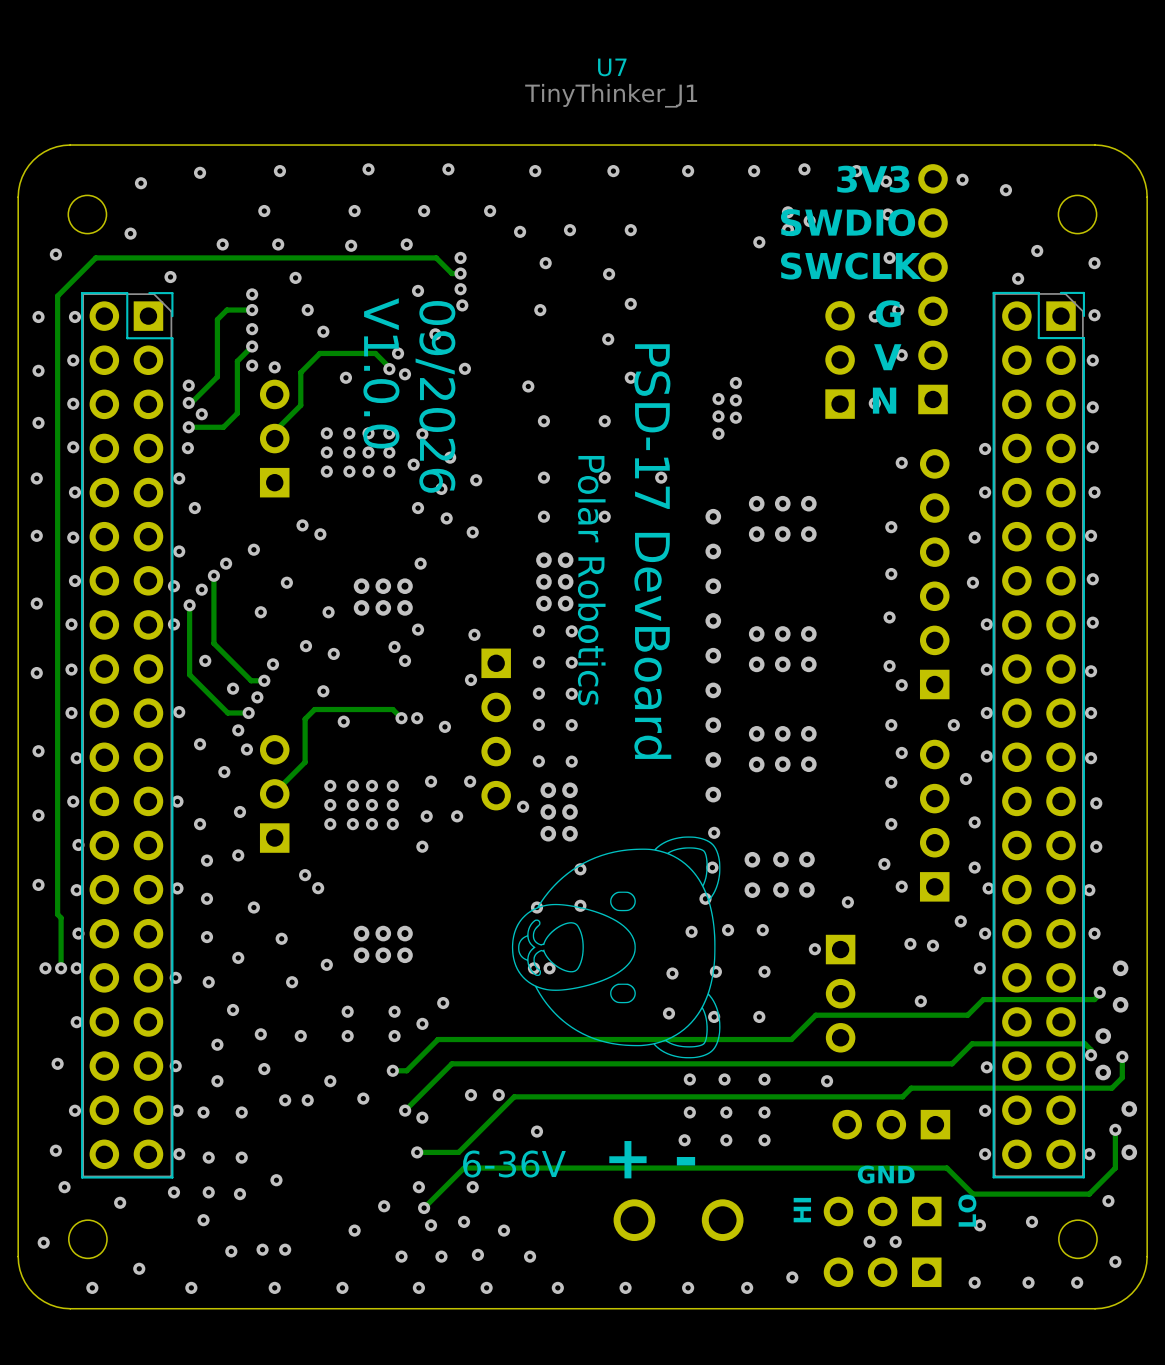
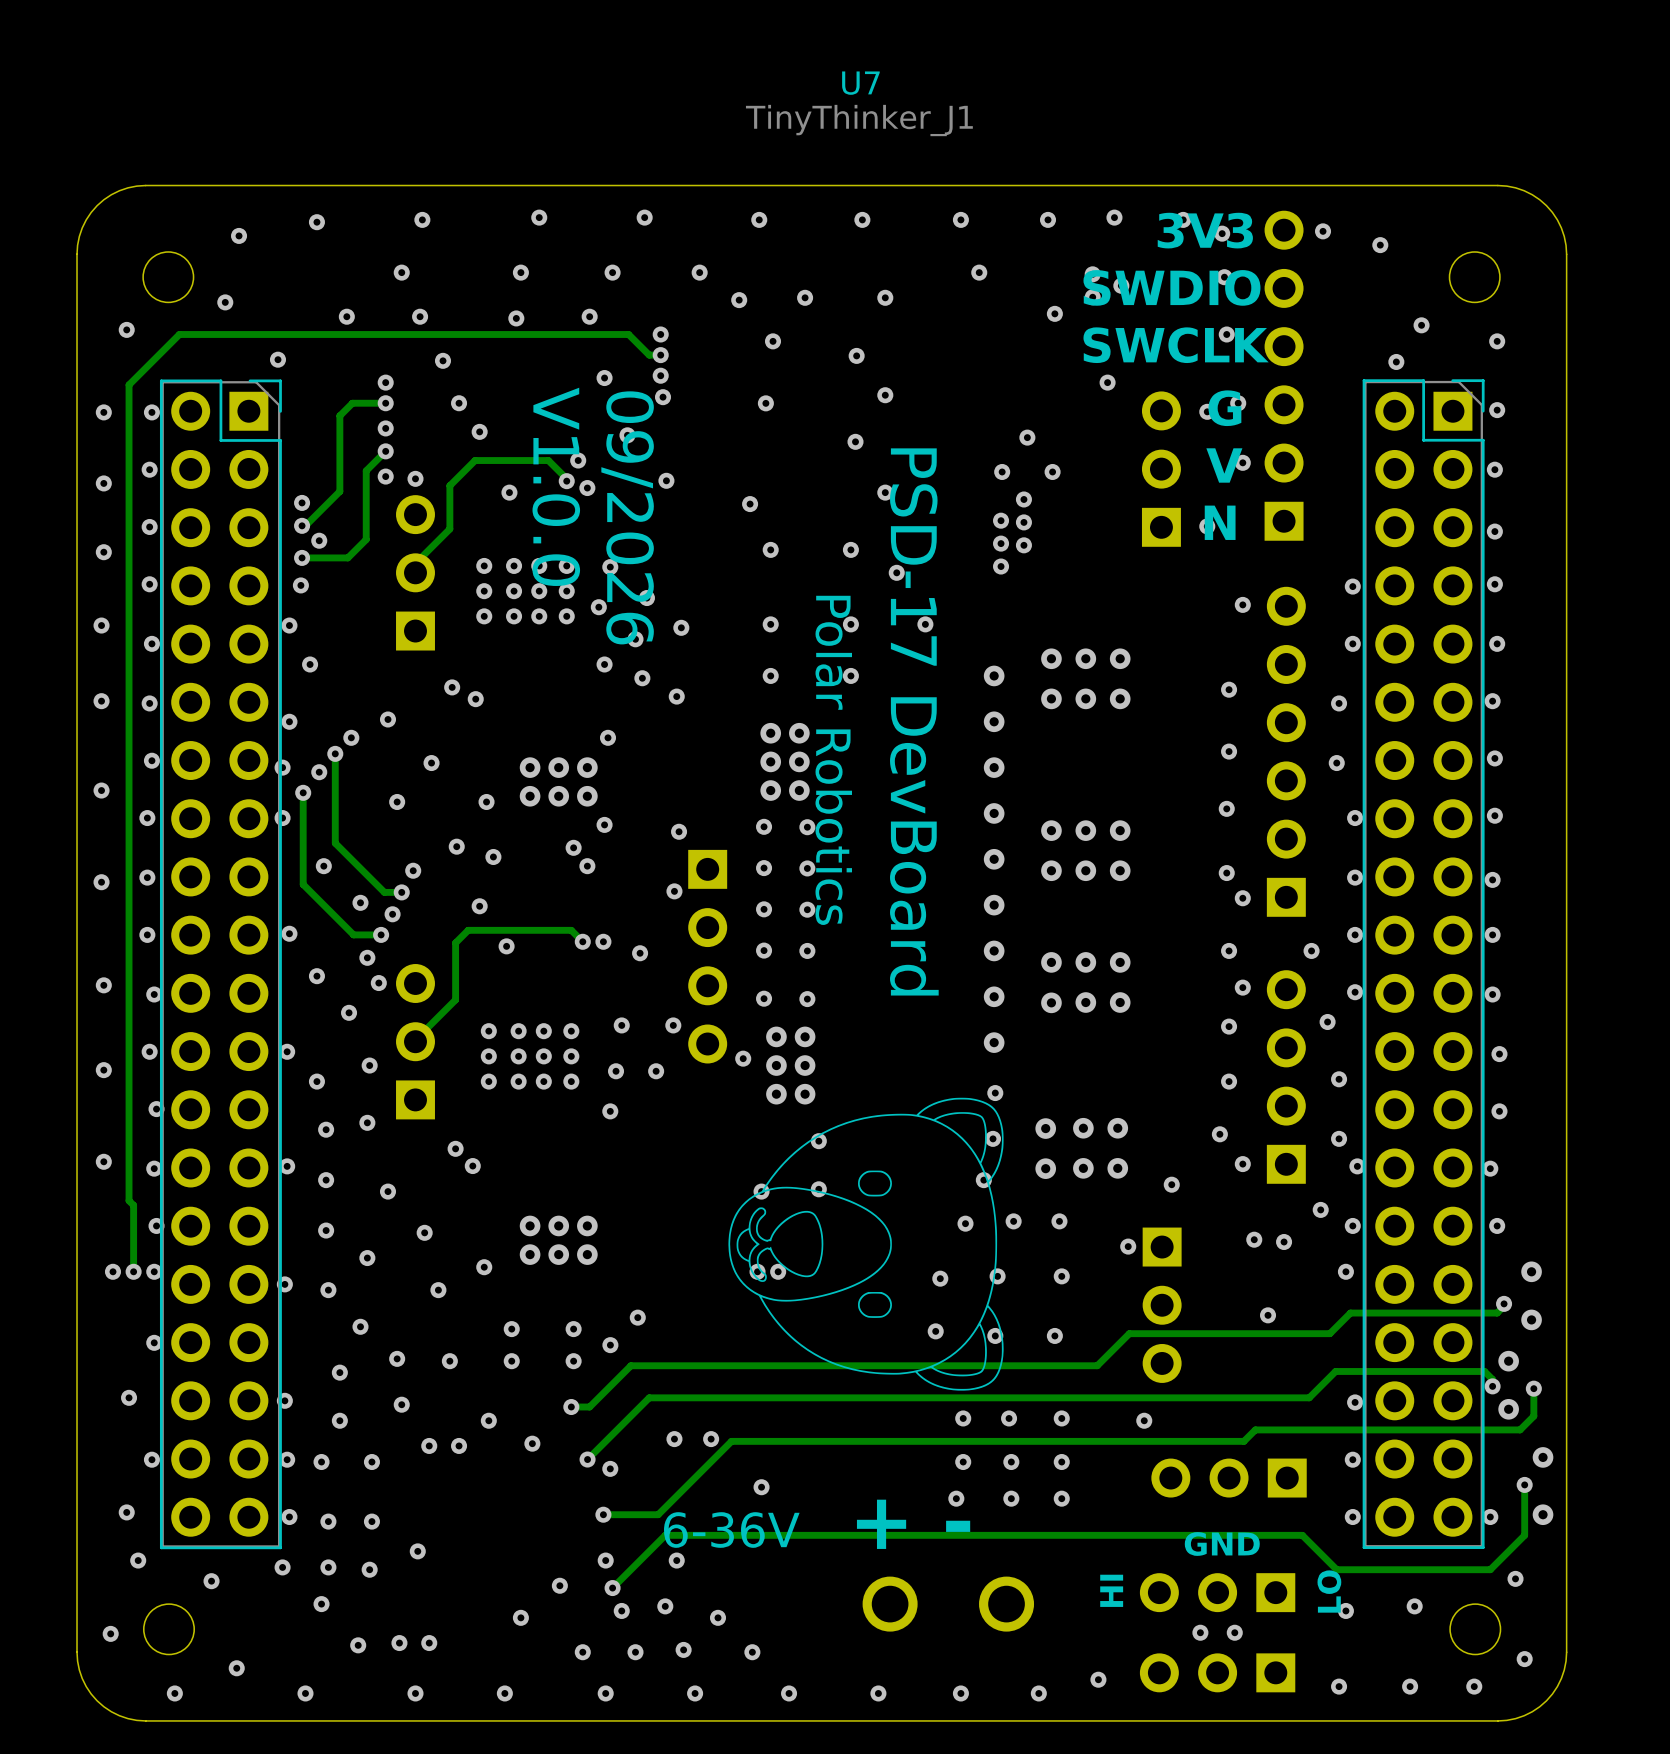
via: none -> (979, 272)
via: none -> (1107, 382)
via: none -> (1027, 437)
via: none -> (1002, 471)
via: none -> (1052, 471)
via: none -> (896, 572)

